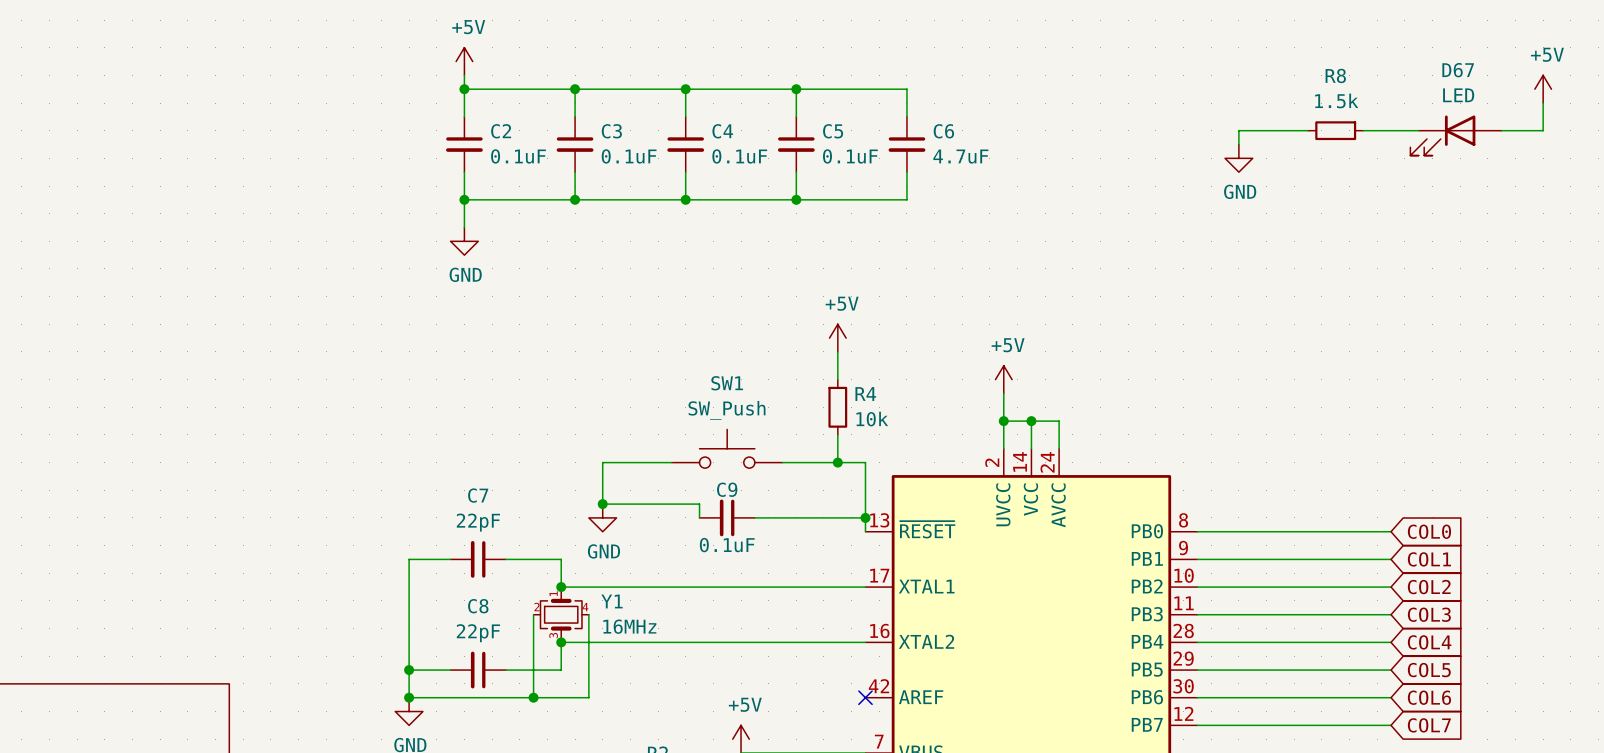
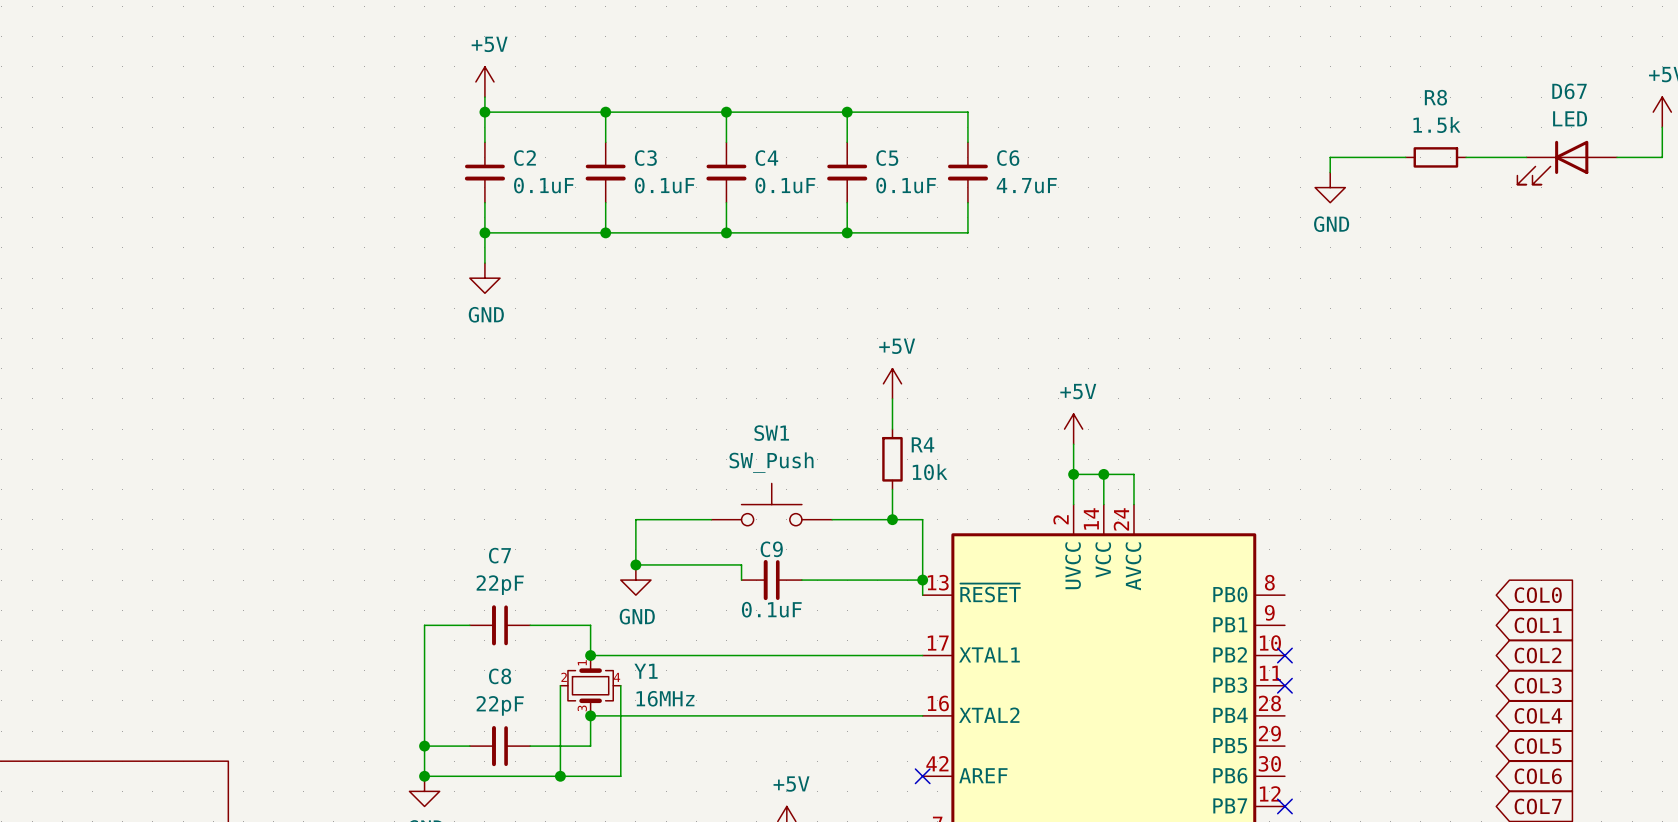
wire: (1197, 531) (1391, 531) -> none
wire: (1197, 559) (1391, 559) -> none
wire: (1197, 587) (1391, 587) -> none
no-connect mark: none -> (1284, 655)
wire: (1197, 614) (1391, 614) -> none
no-connect mark: none -> (1284, 685)
wire: (1197, 642) (1391, 642) -> none
wire: (1197, 670) (1391, 670) -> none
wire: (1197, 697) (1391, 697) -> none
wire: (1197, 725) (1391, 725) -> none
no-connect mark: none -> (1284, 806)

